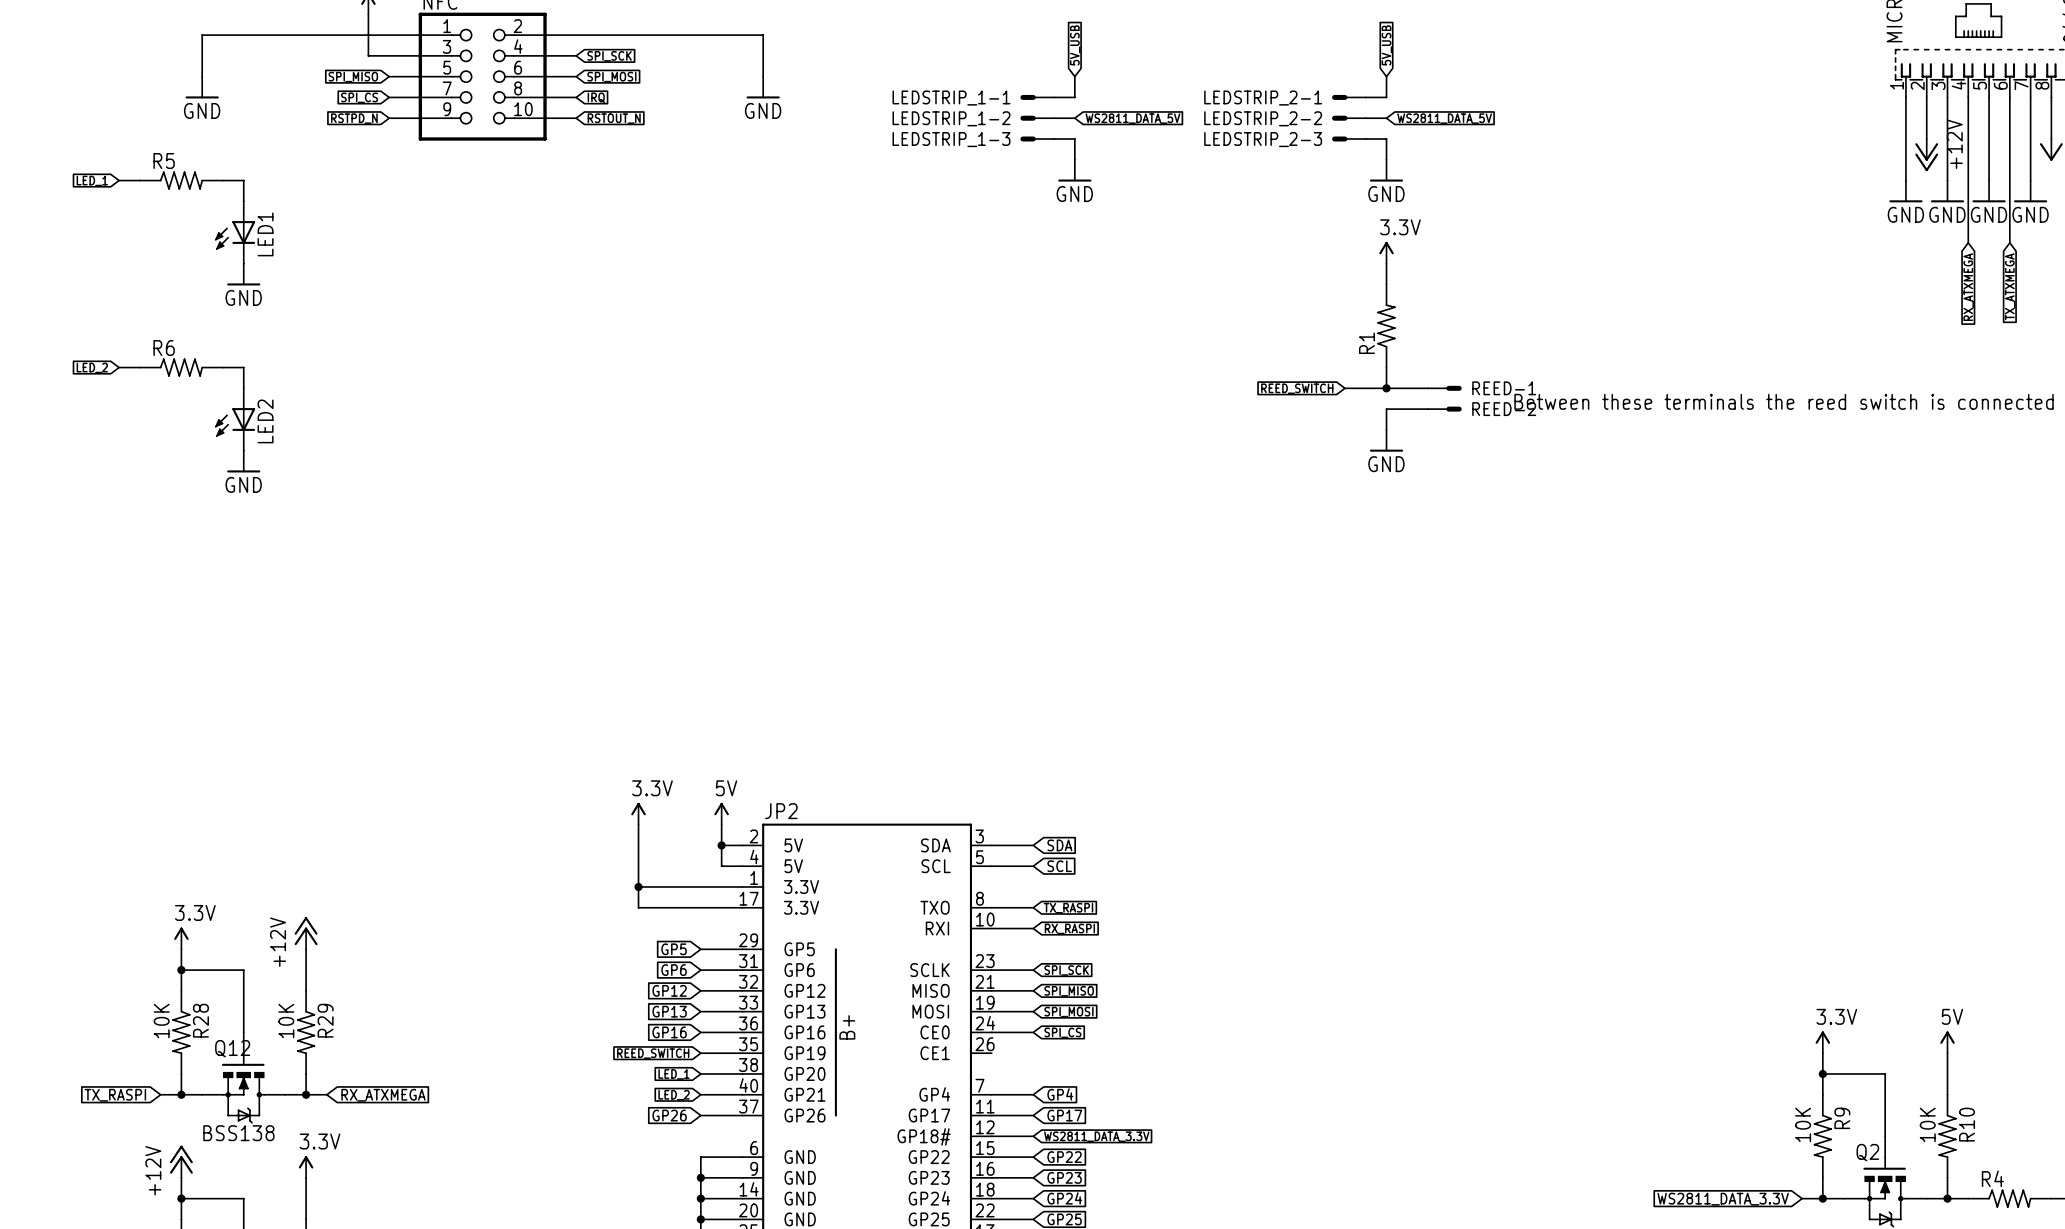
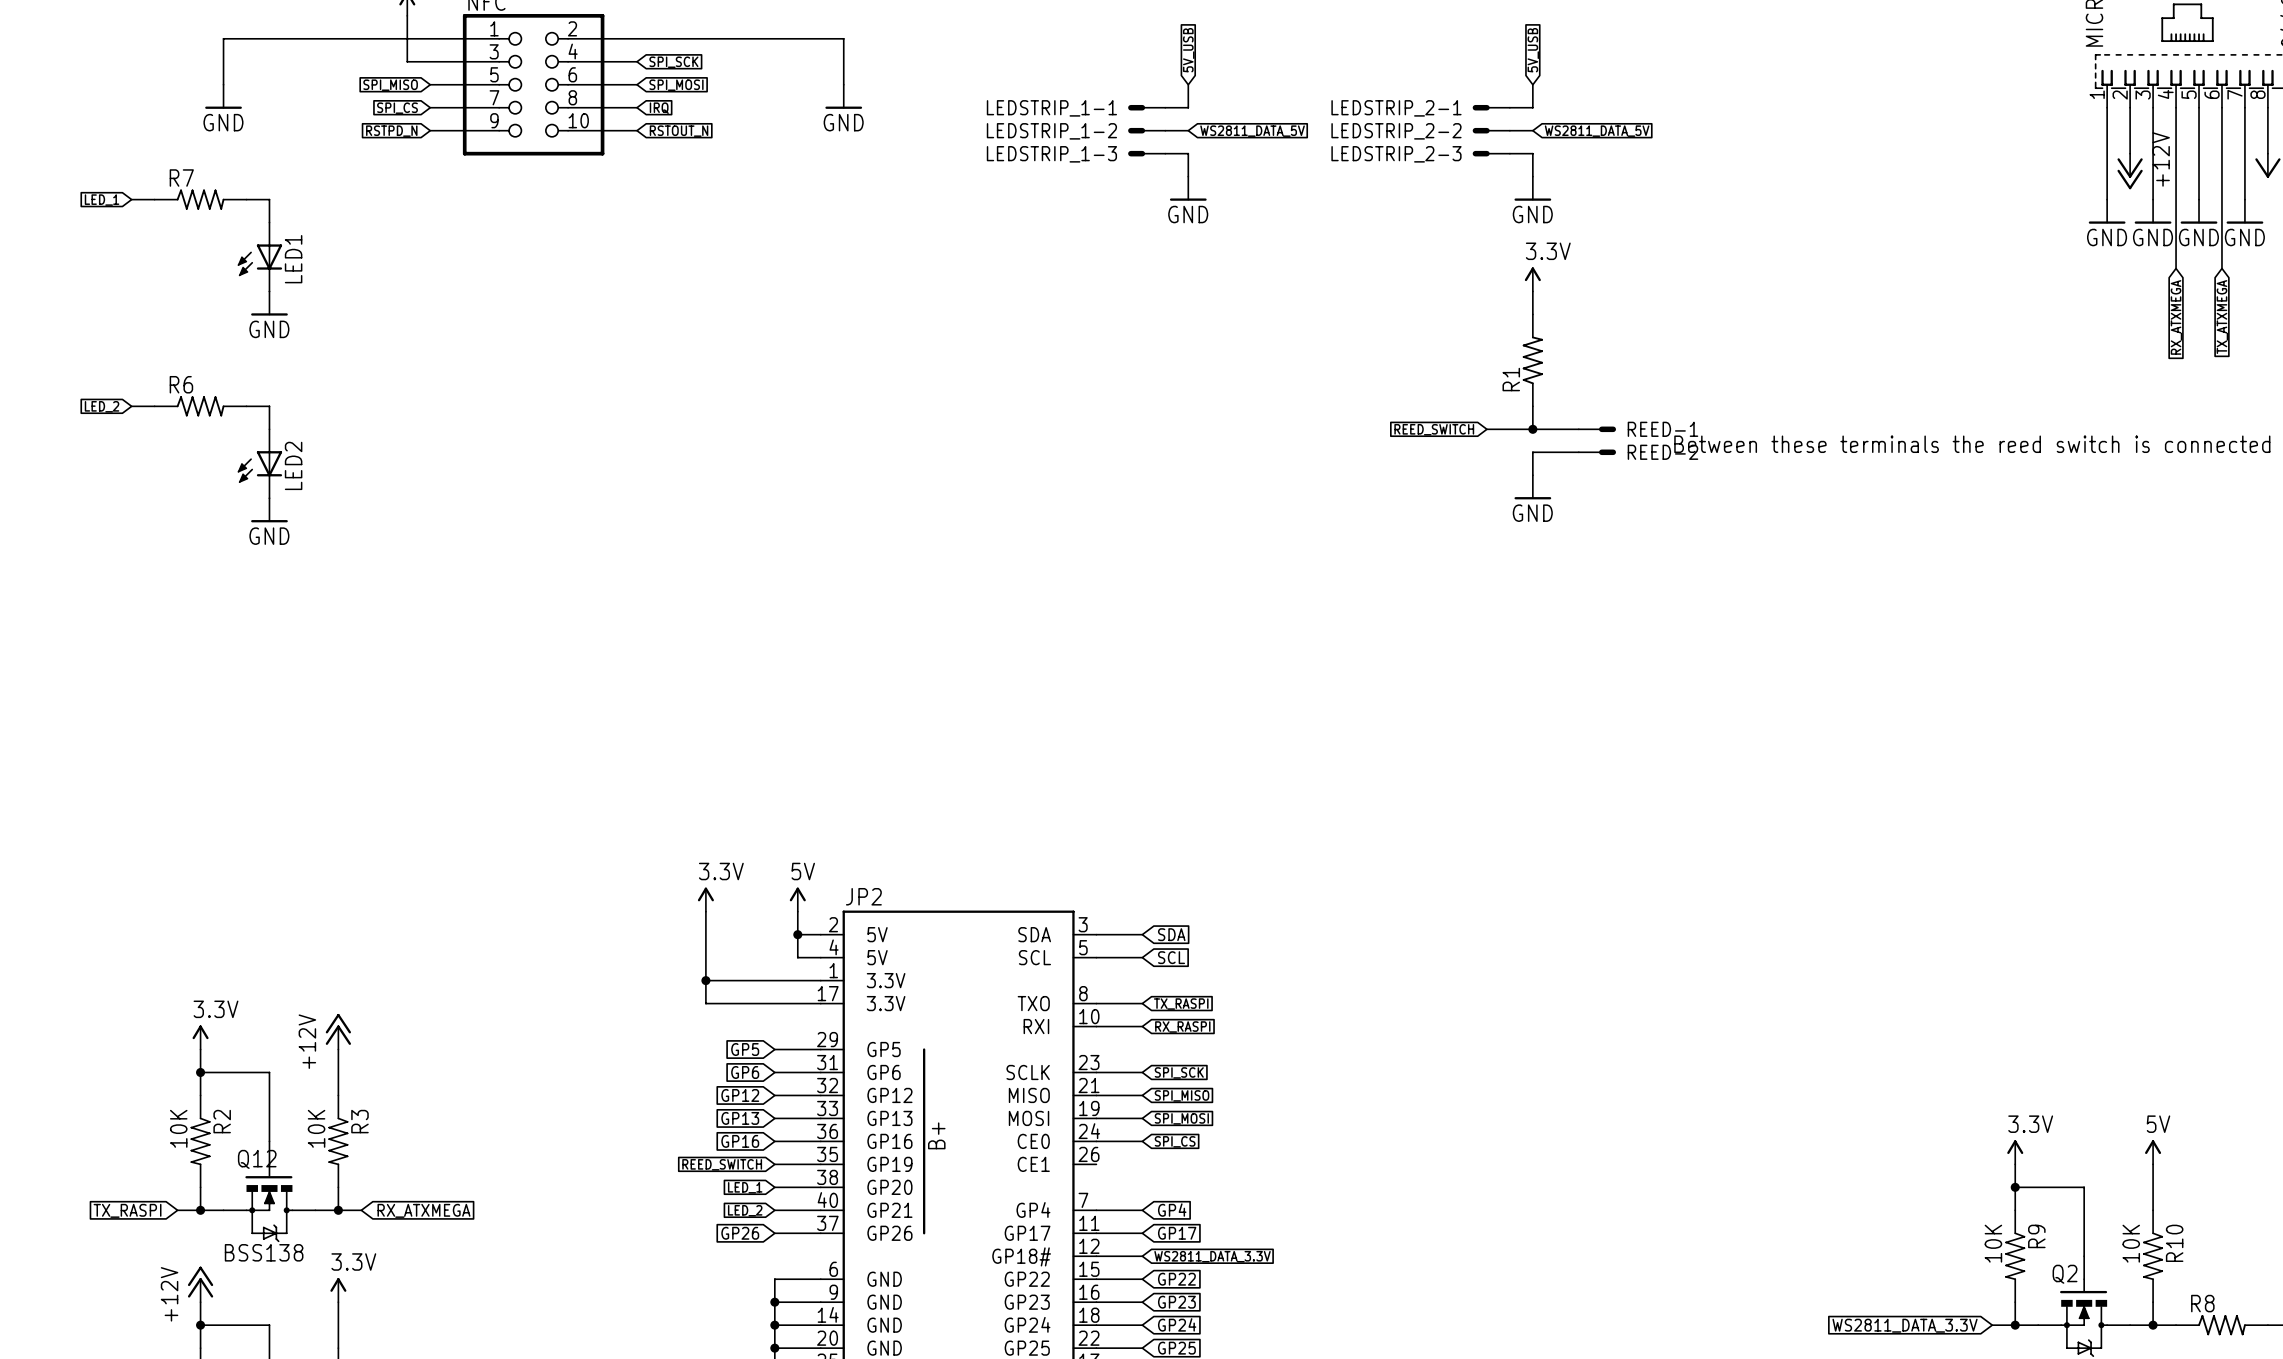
R5 name: R5 (164, 161) -> R7 (181, 178)
R28 name: R28 (200, 1020) -> R2 (222, 1121)
R29 name: R29 (325, 1020) -> R3 (359, 1121)
R4 name: R4 (1992, 1178) -> R8 (2202, 1303)

